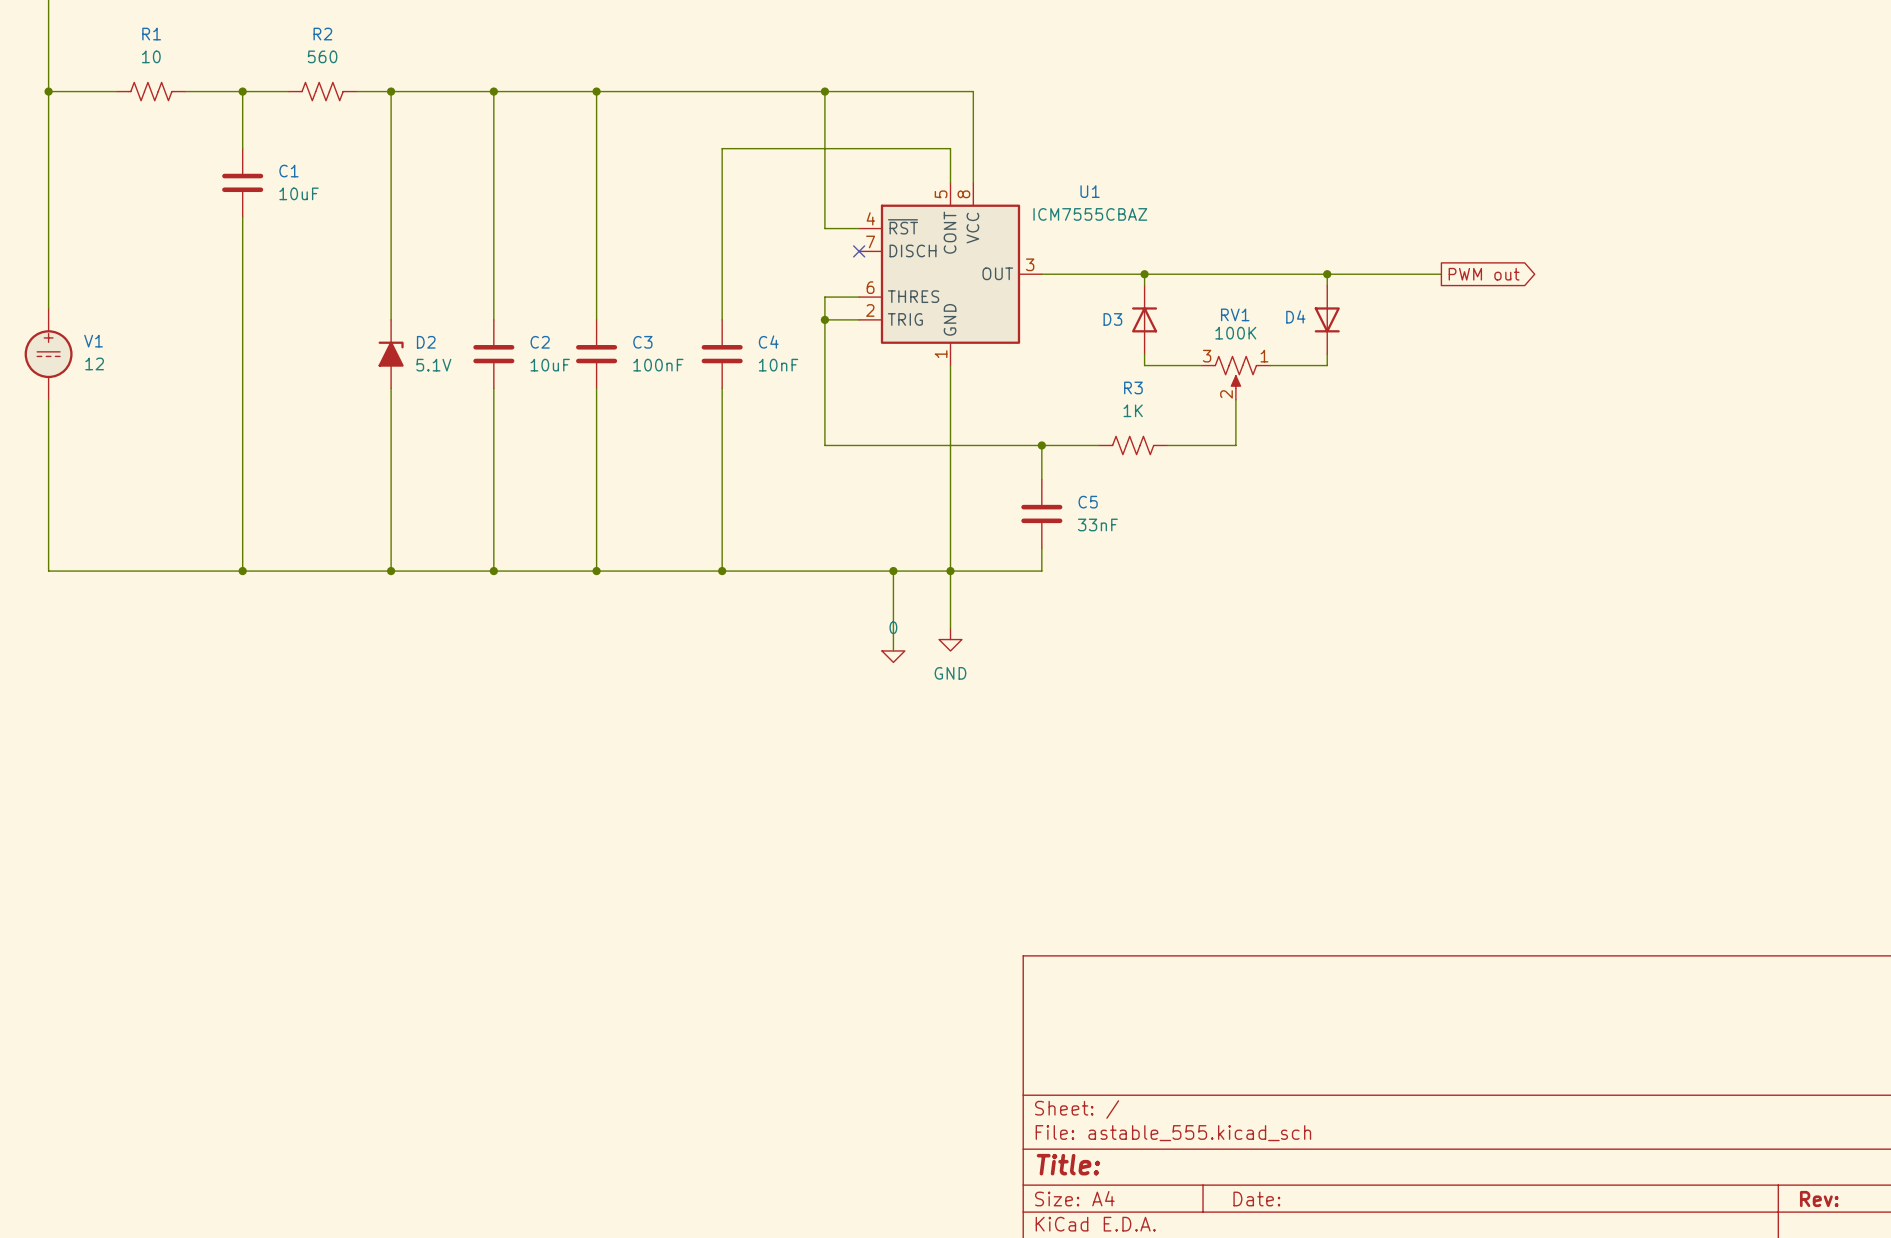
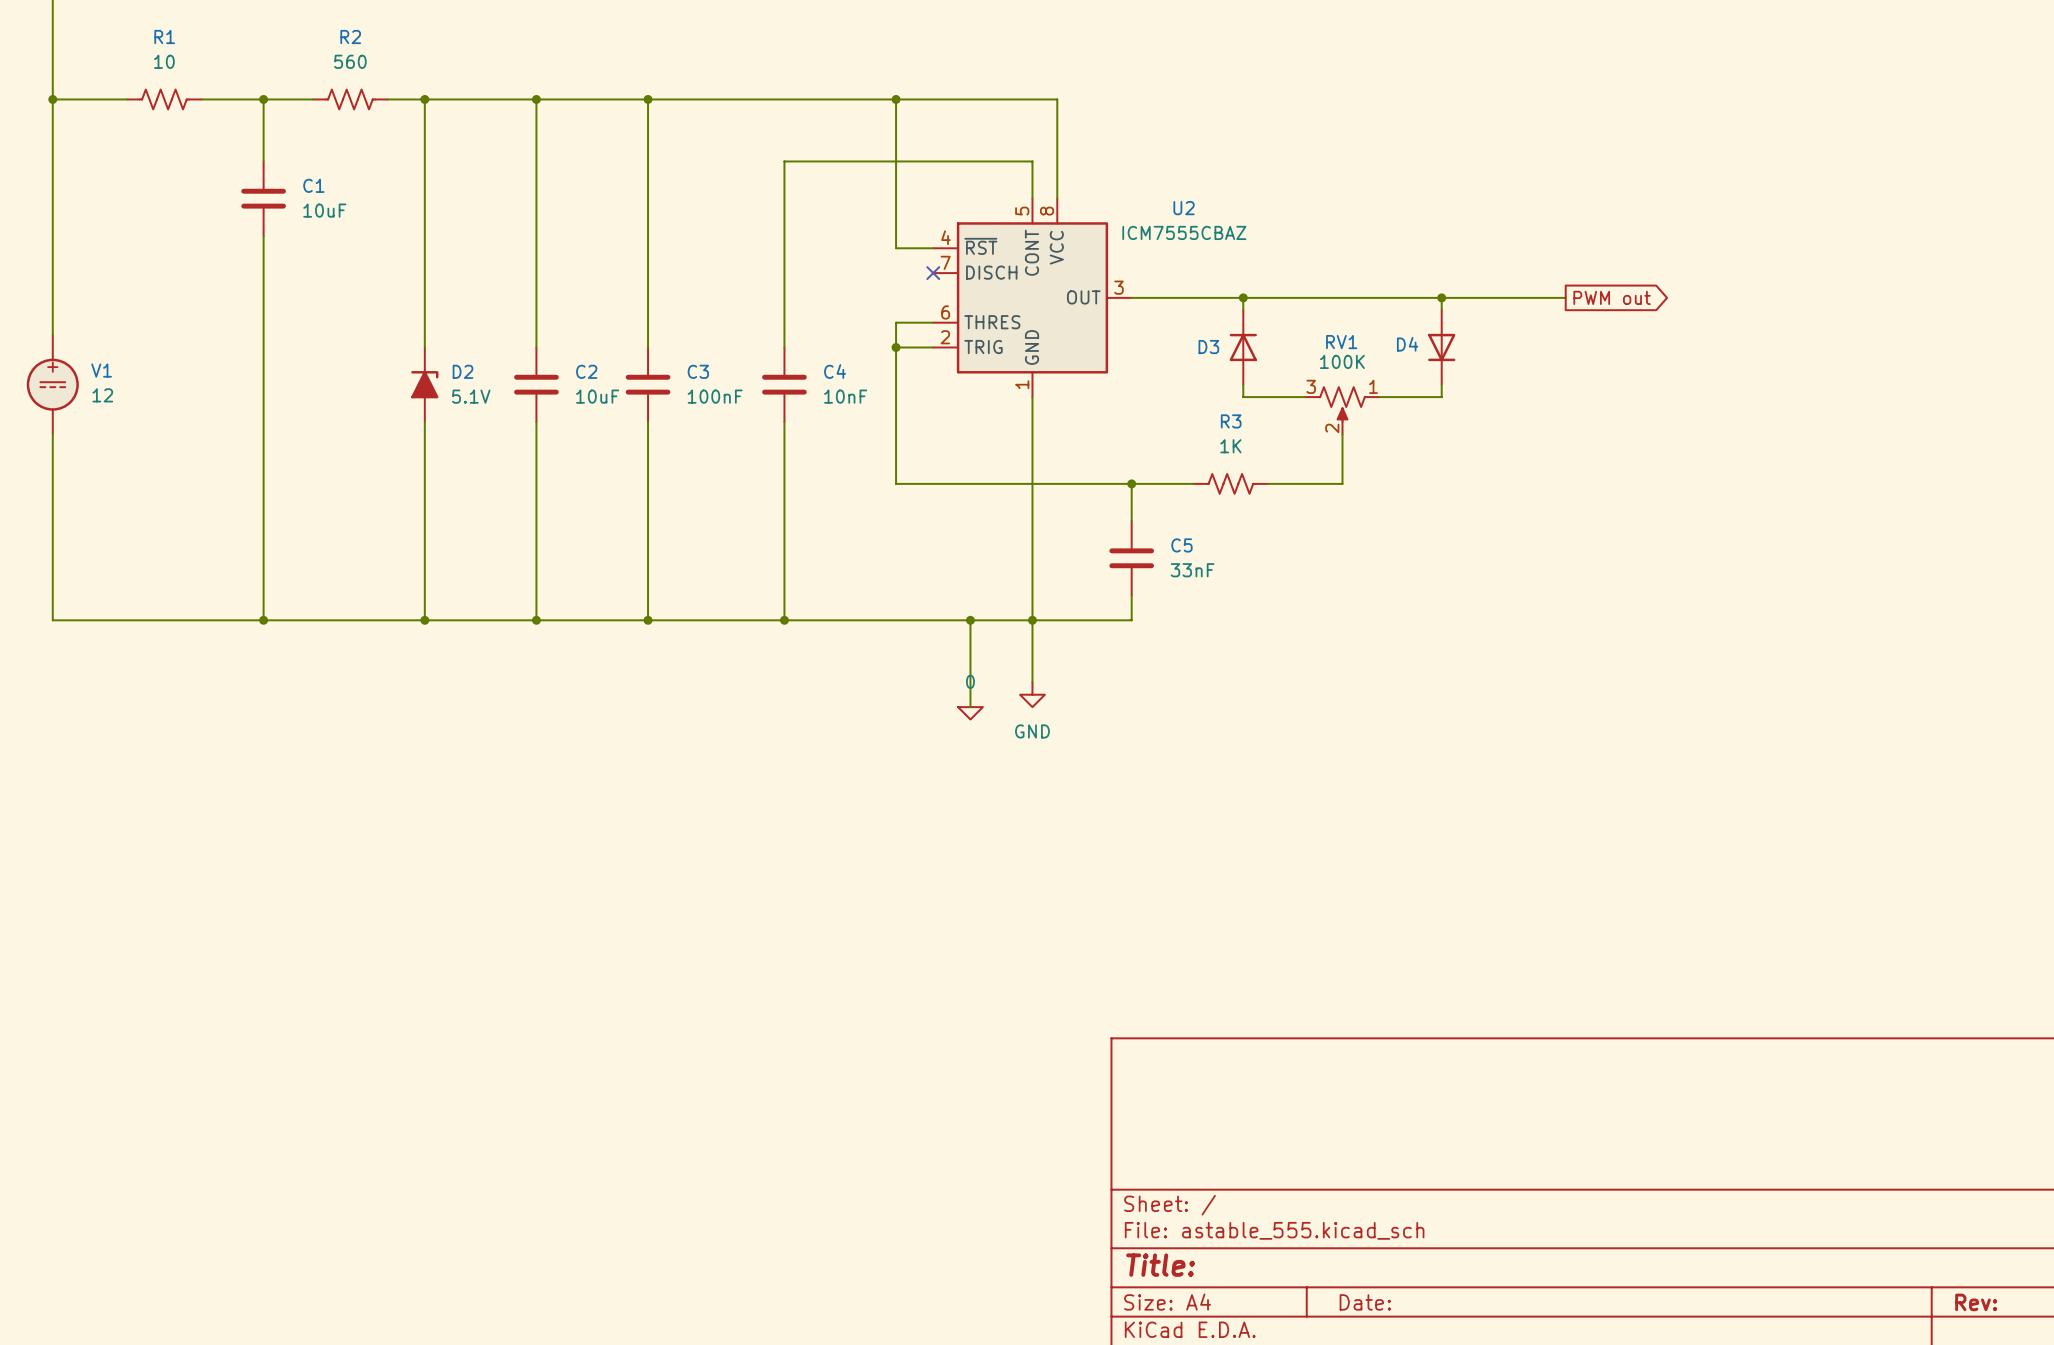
U1 name: U1 (1090, 191) -> U2 (1184, 208)

